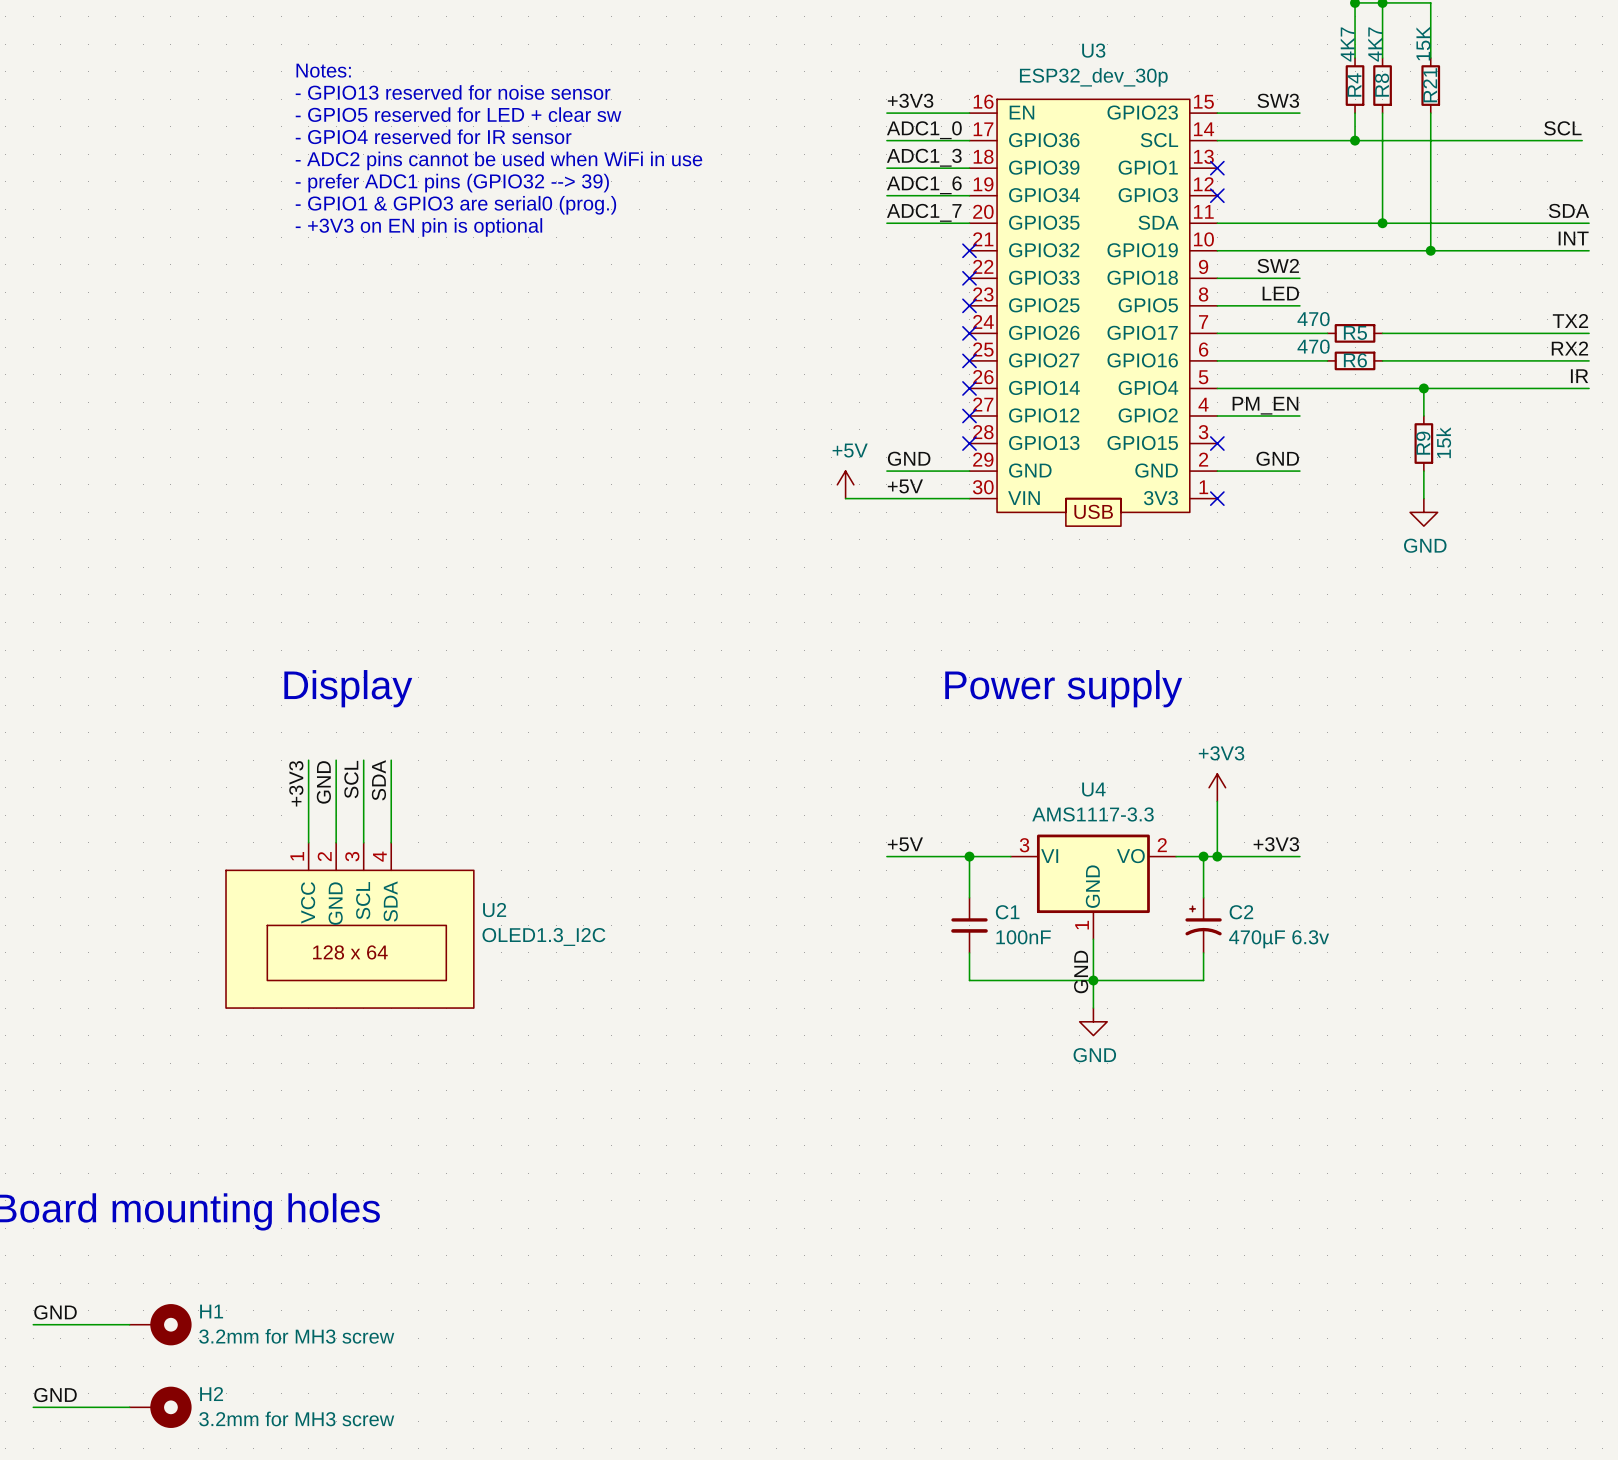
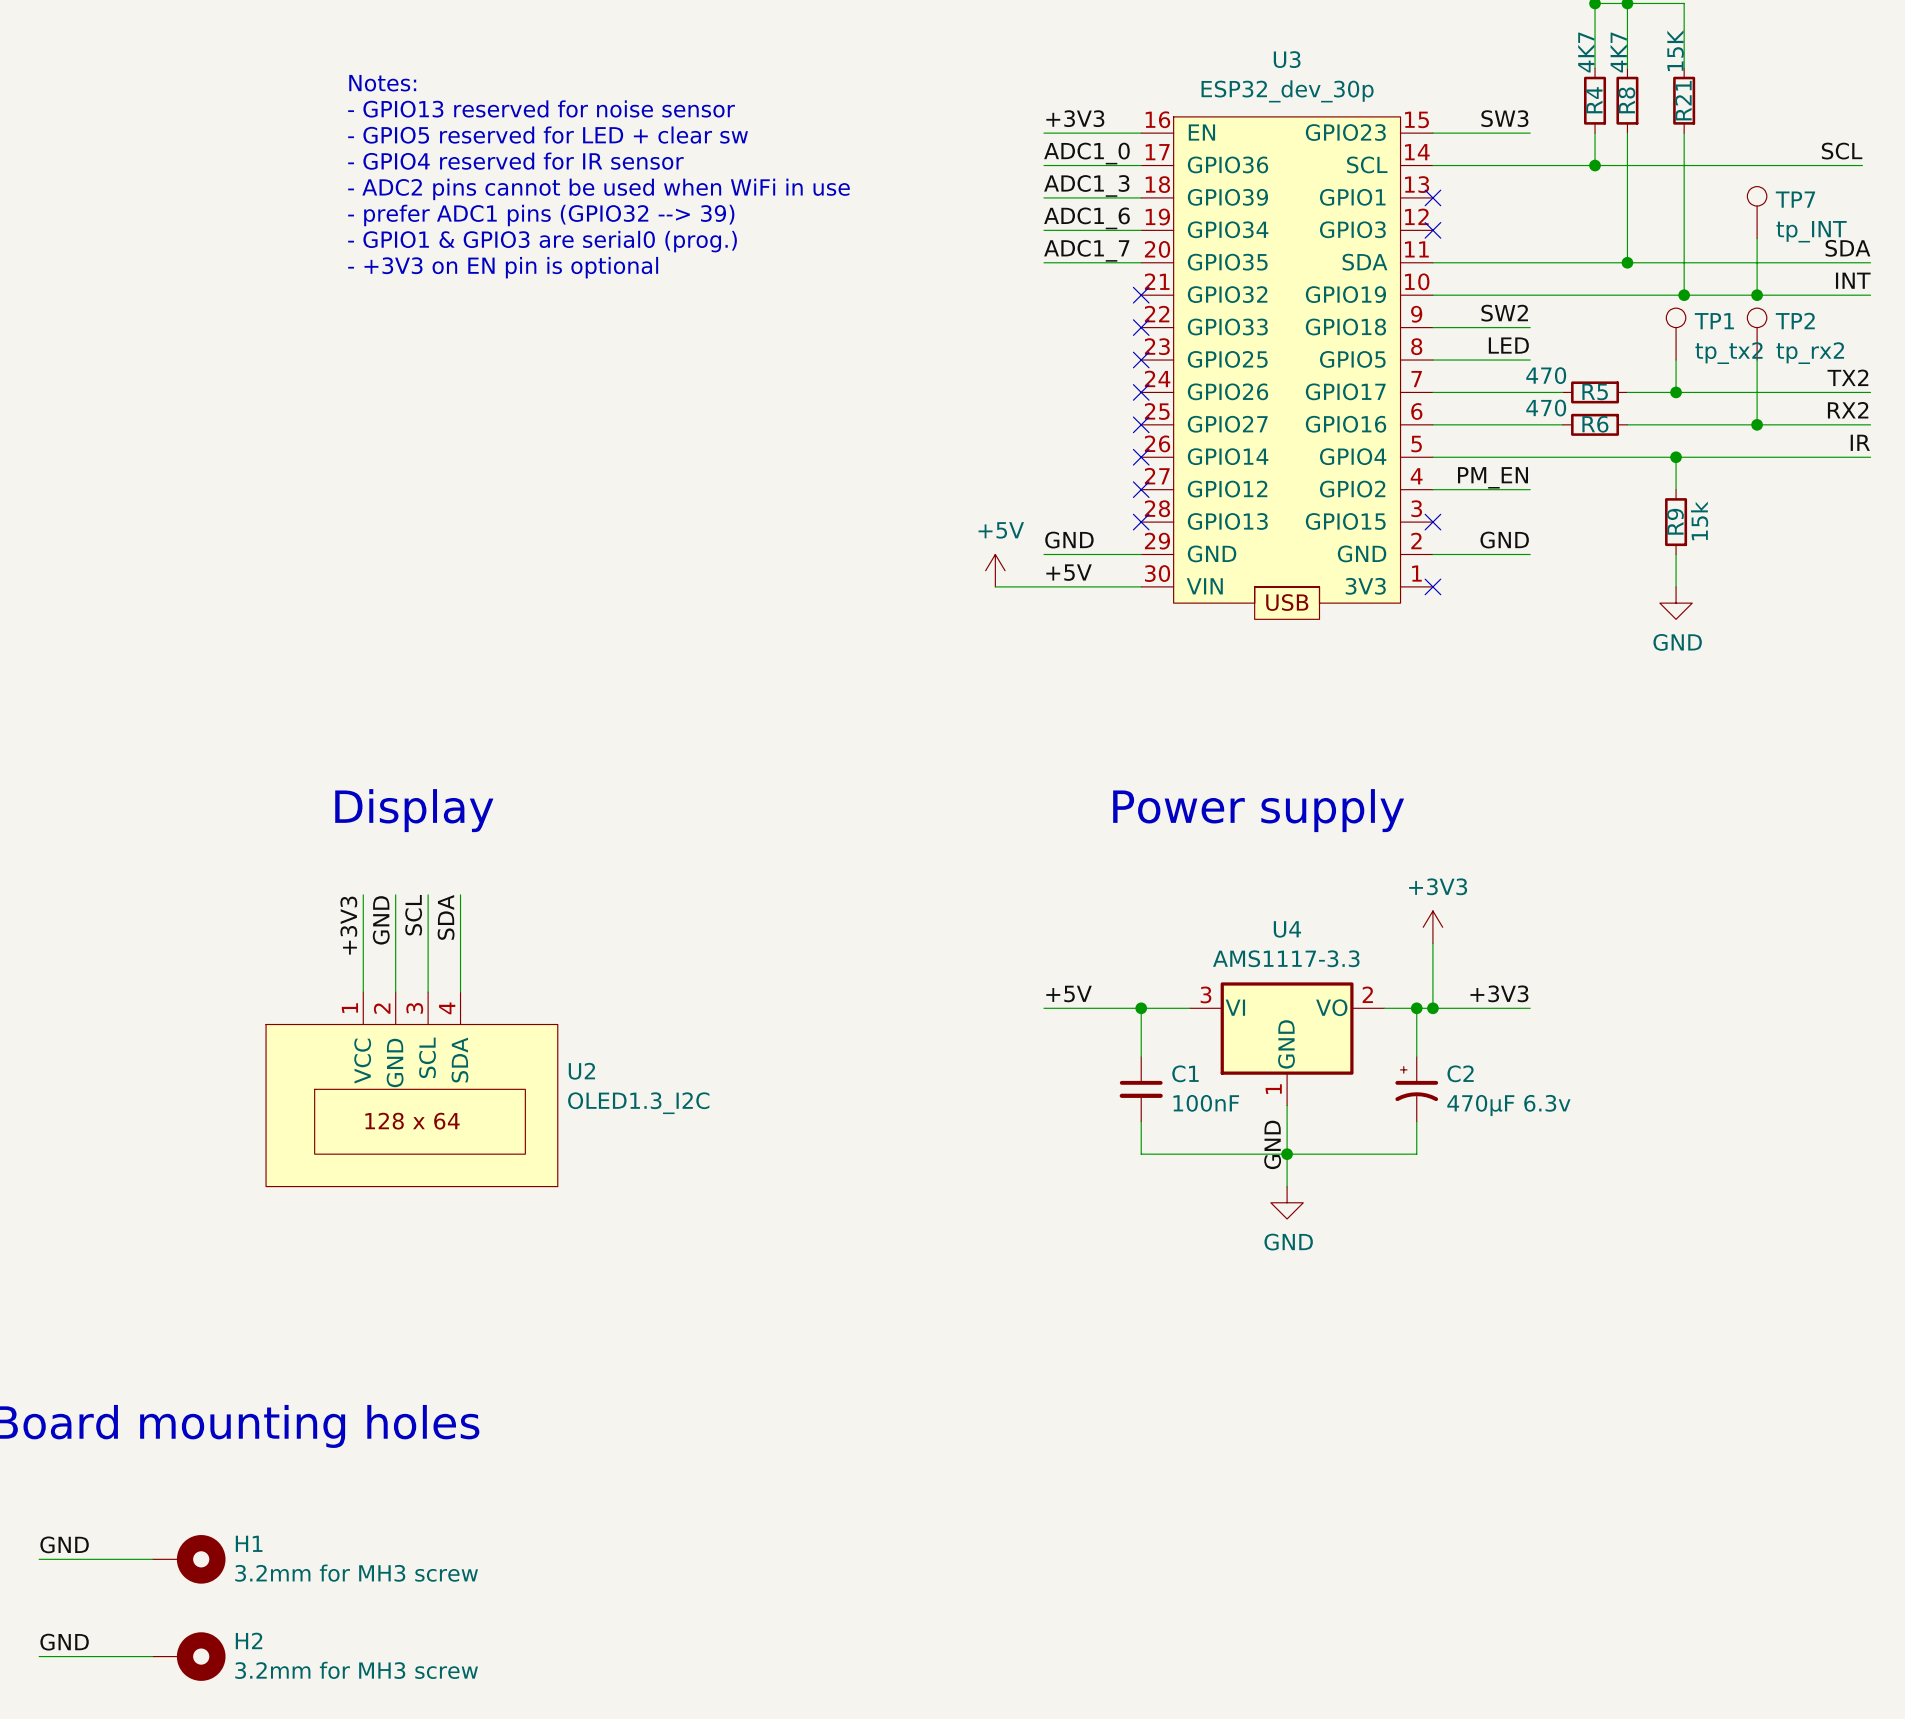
TP7: none -> tp_INT (1757, 212)
wire: none -> (1757, 238) (1757, 295)
junction: none -> (1757, 295)
TP1: none -> tp_tx2 (1676, 334)
TP2: none -> tp_rx2 (1757, 334)
wire: none -> (1676, 360) (1676, 392)
wire: none -> (1757, 360) (1757, 424)
junction: none -> (1676, 392)
junction: none -> (1757, 424)

